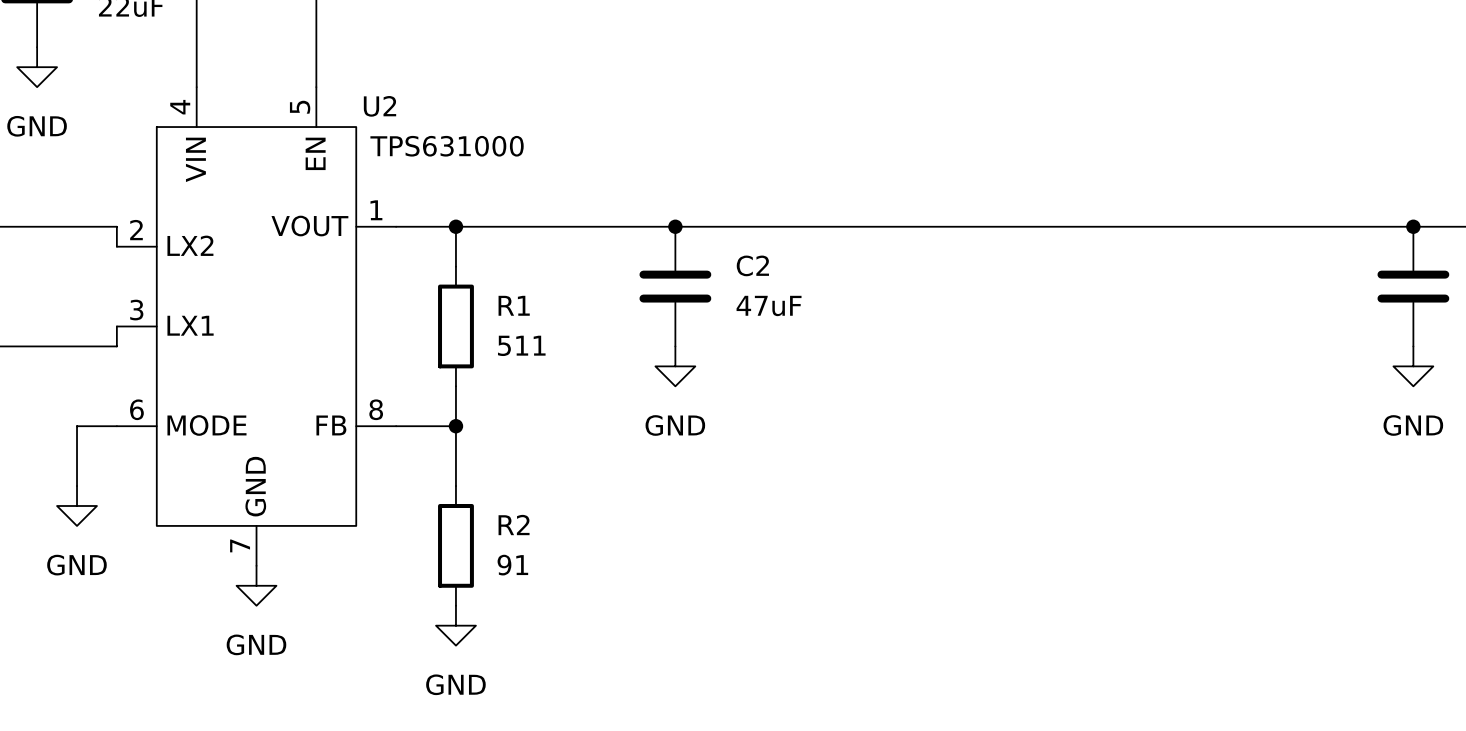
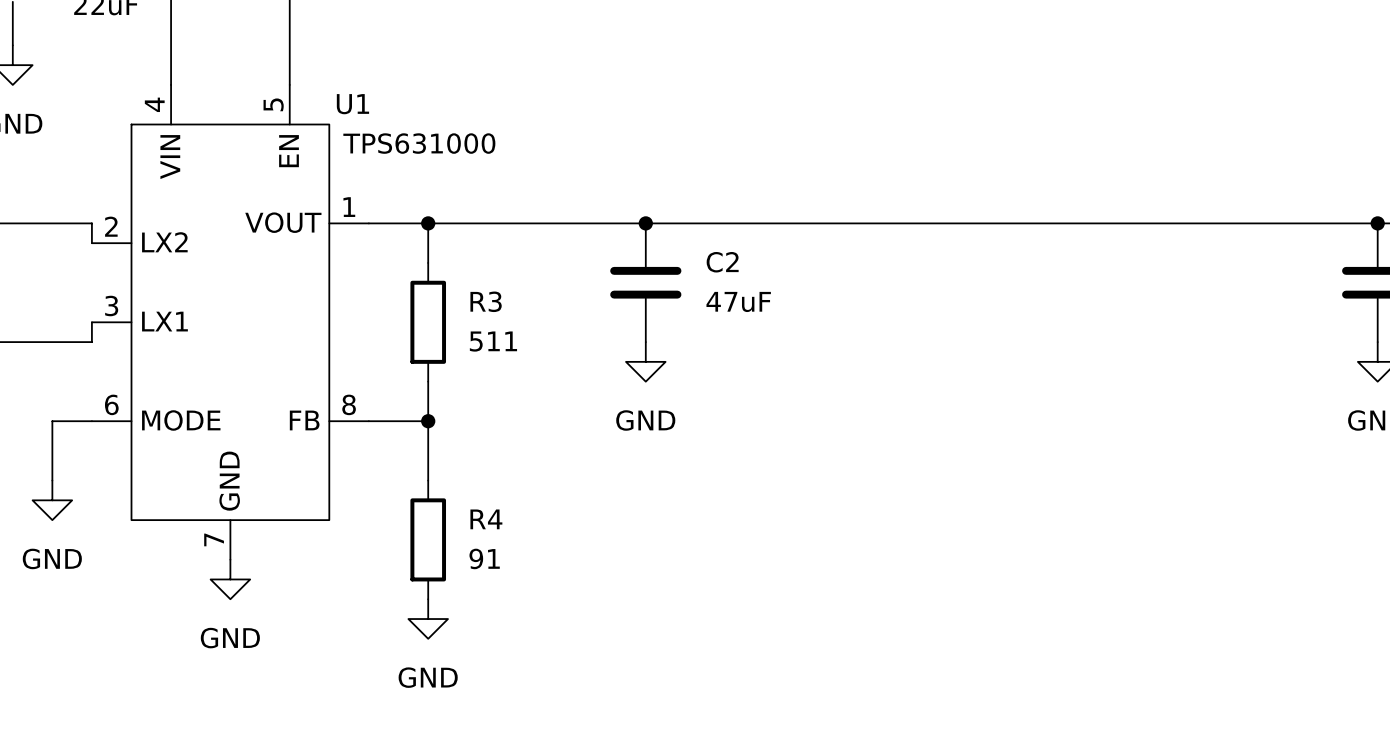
U2 name: U2 (380, 106) -> U1 (352, 104)
R1 name: R1 (514, 305) -> R3 (486, 301)
R2 name: R2 (514, 525) -> R4 (486, 519)

